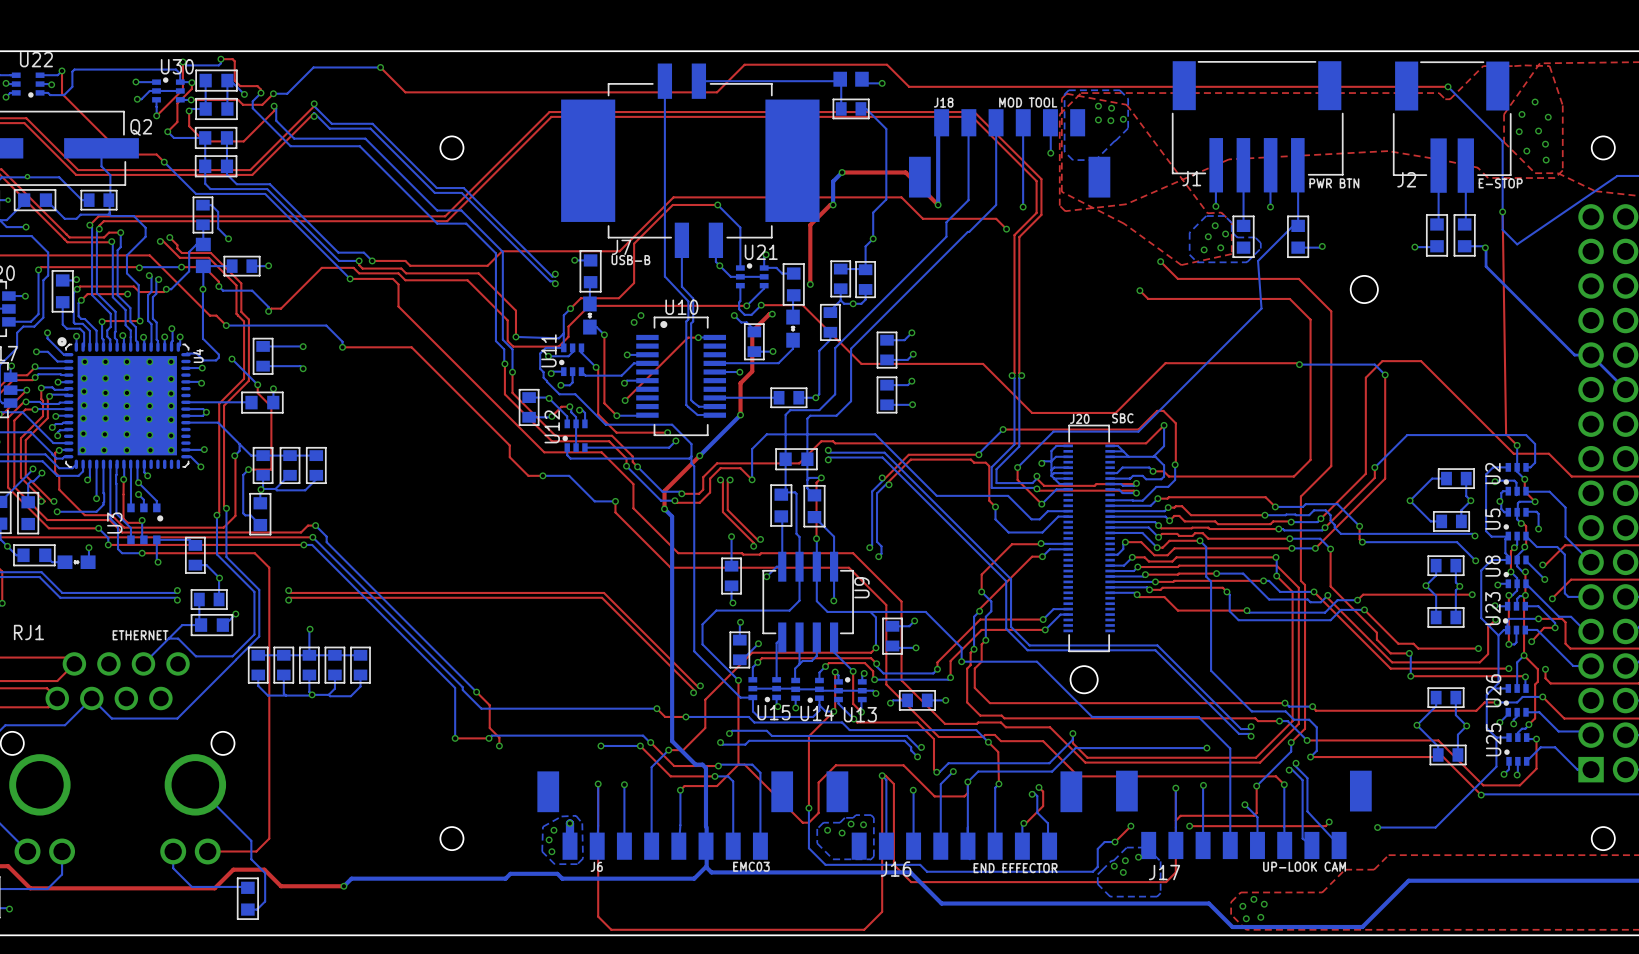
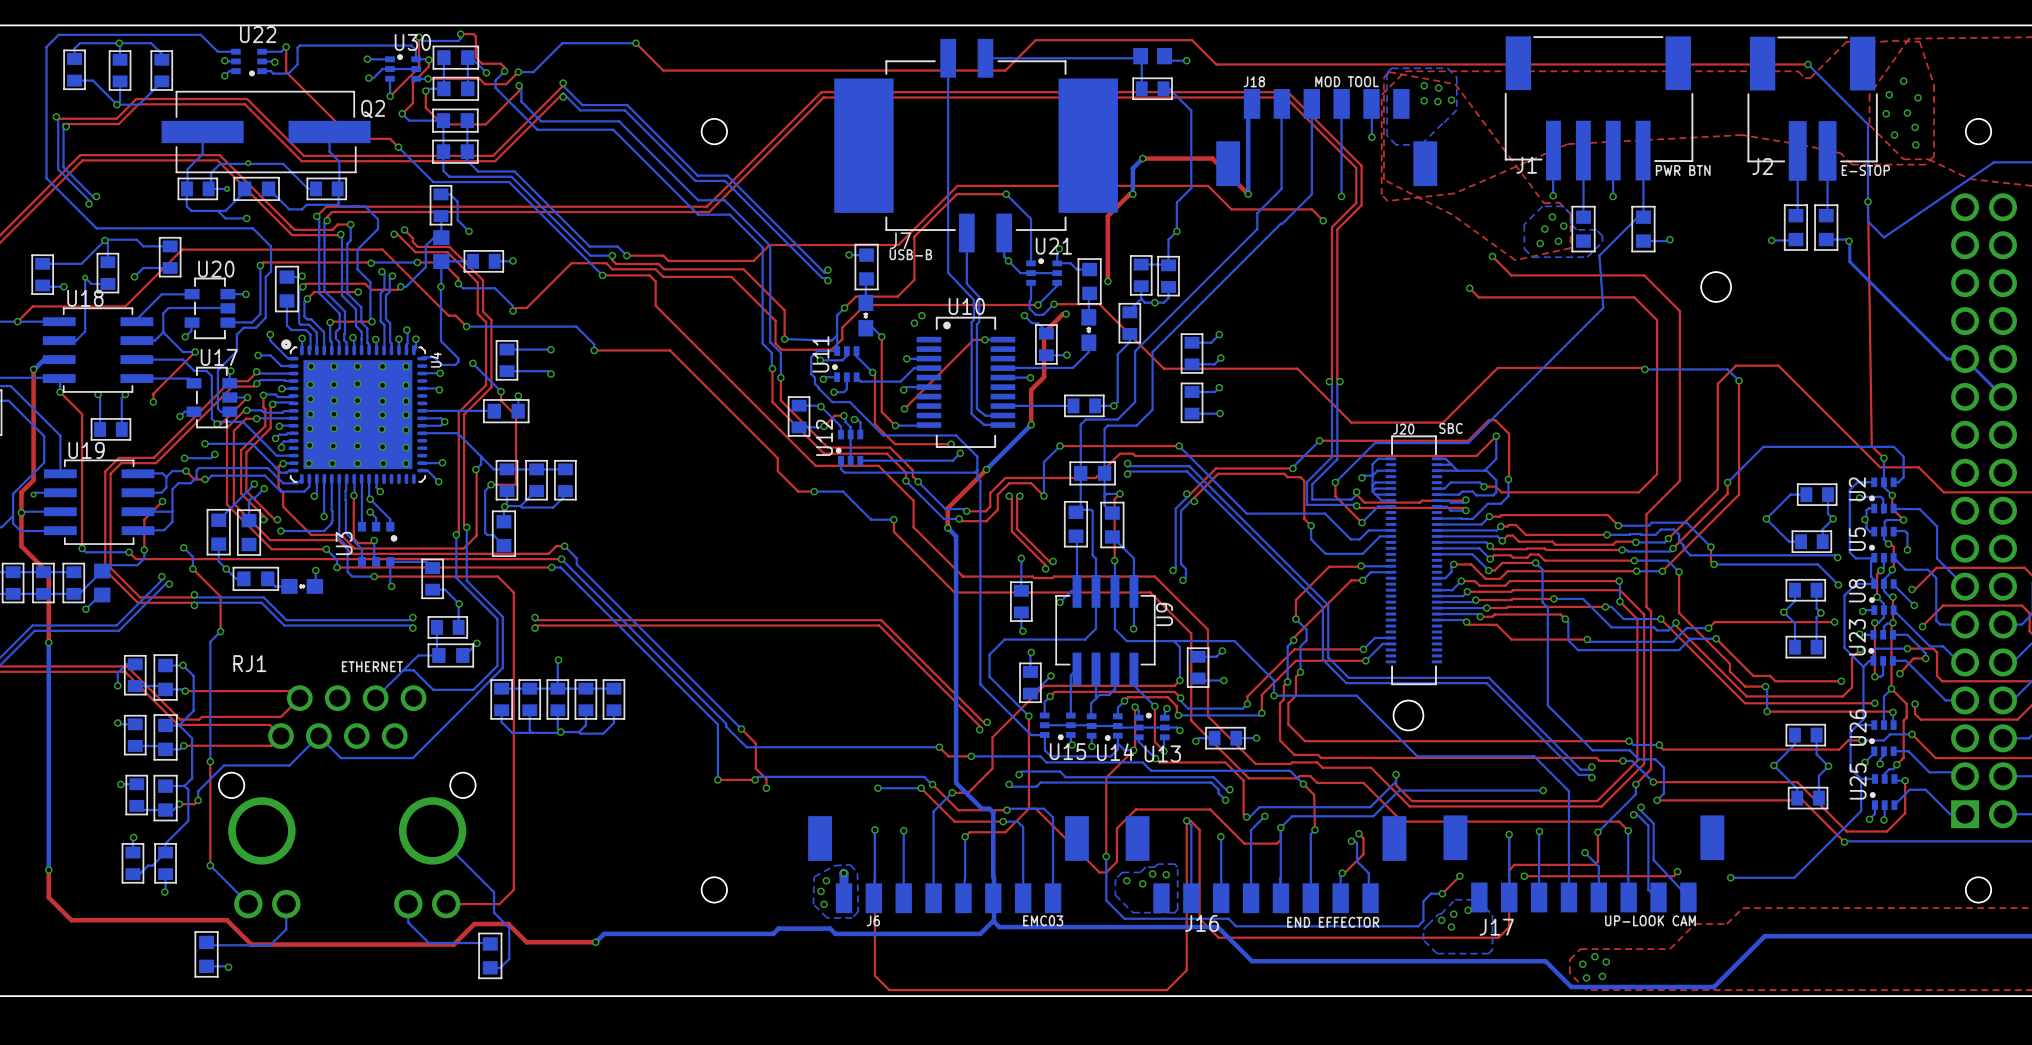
via: none -> (1060, 446)
bottom track: (875, 434) (766, 434) -> none
top track: none -> (1179, 446) (1060, 446)
via: none -> (1179, 446)

